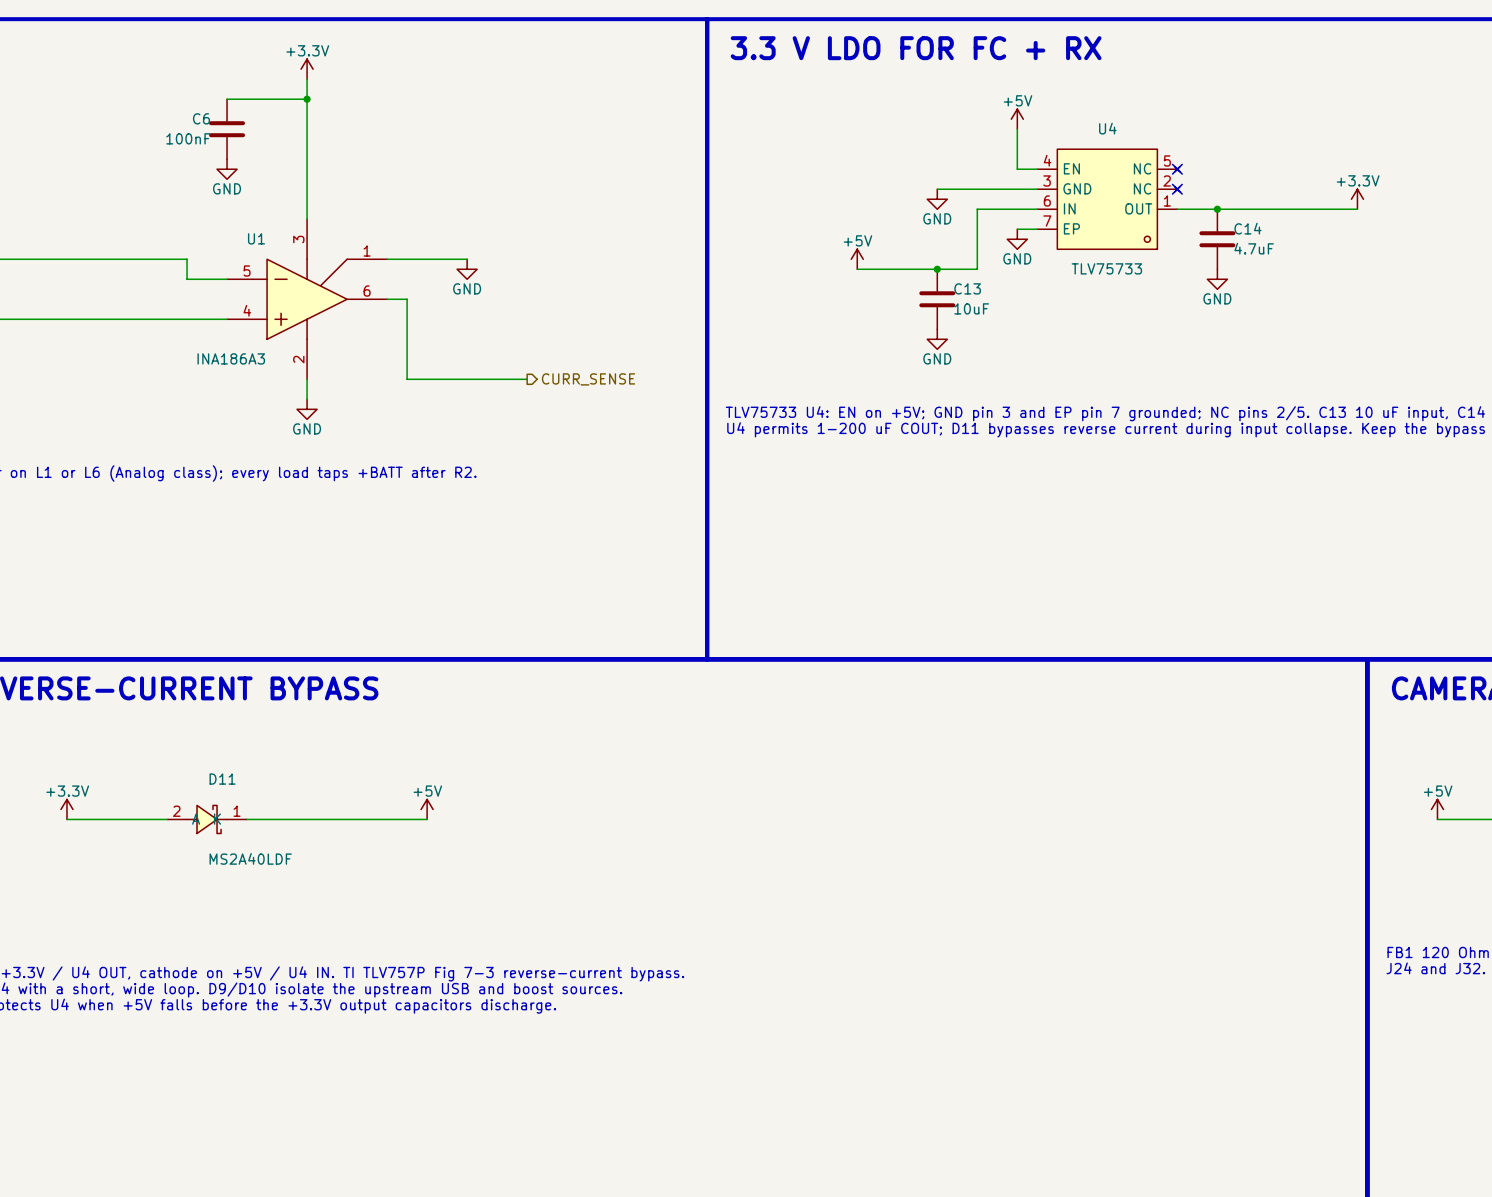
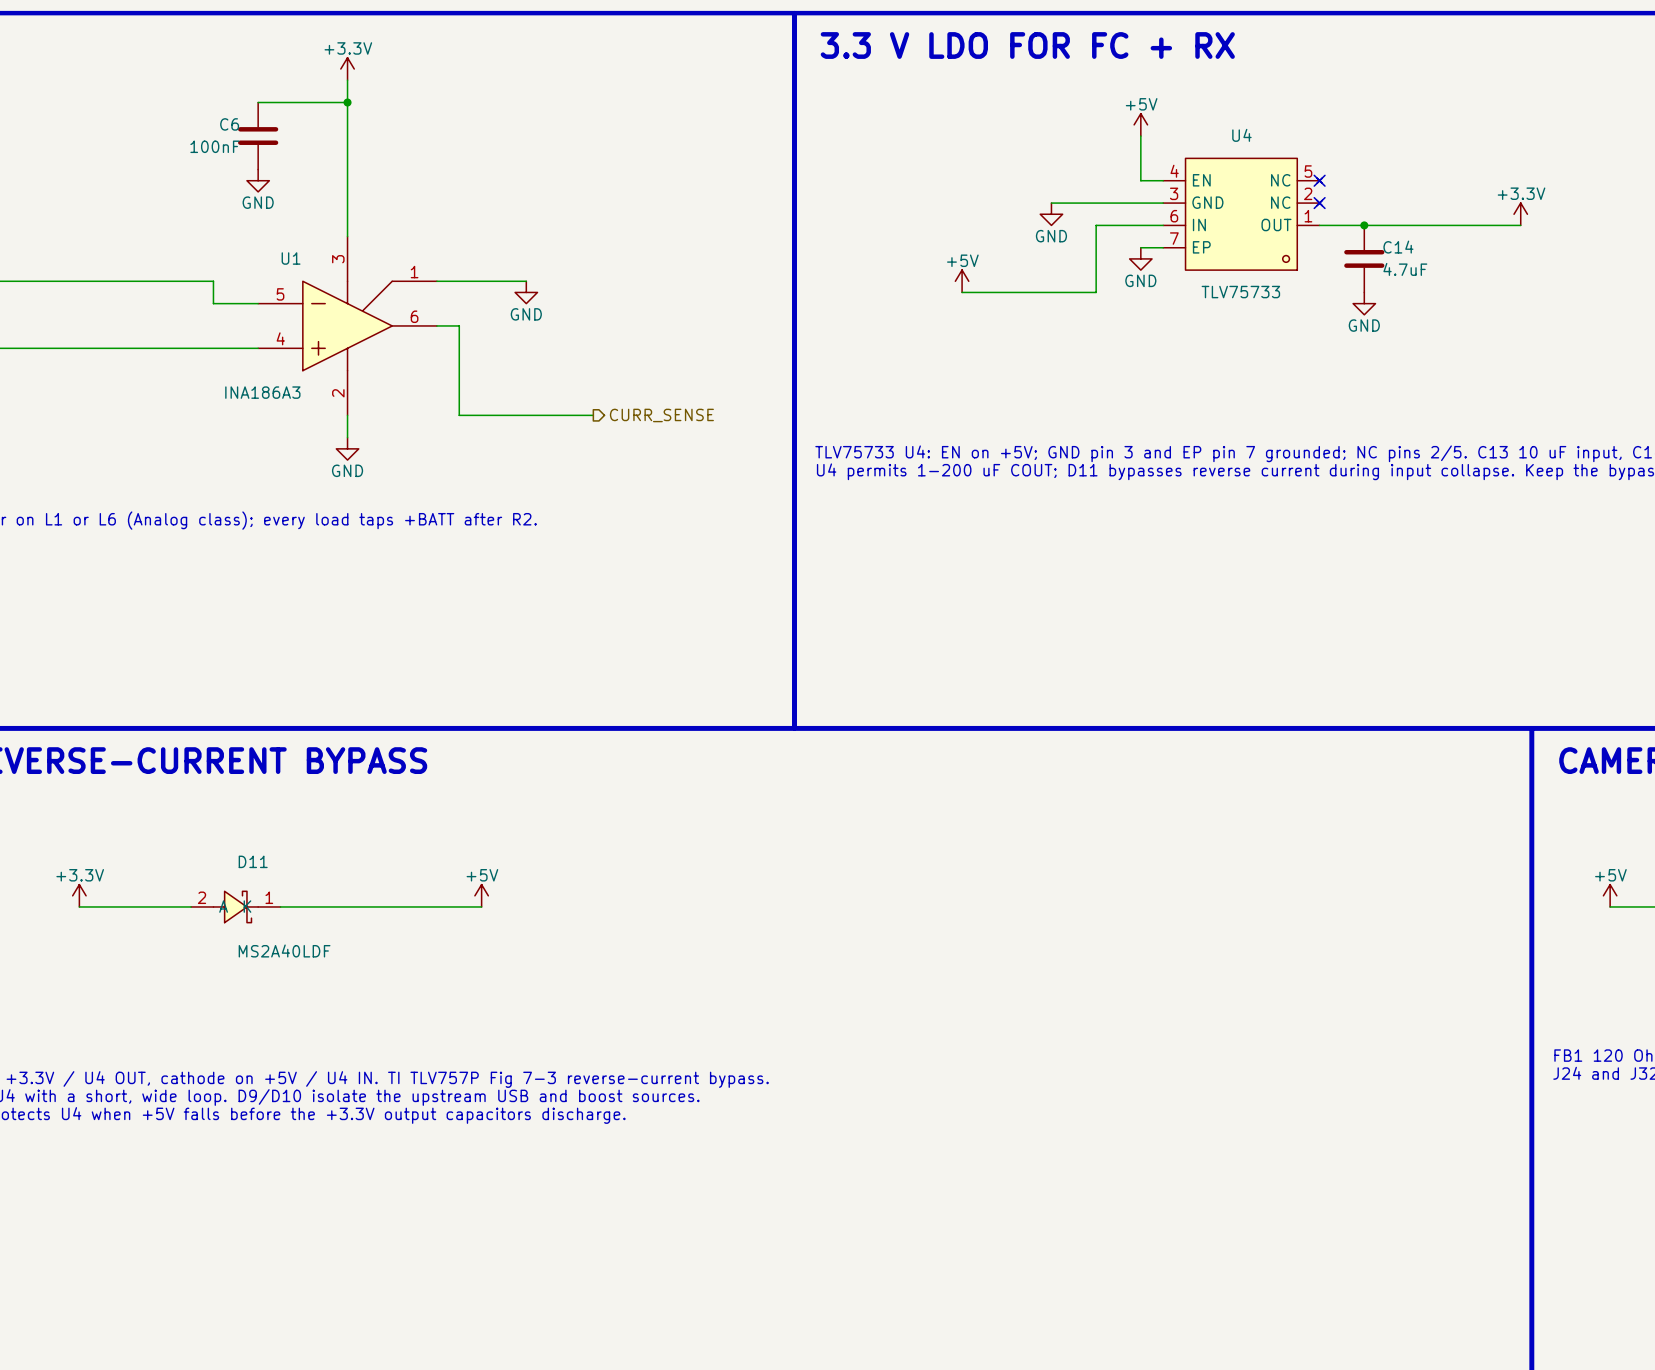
junction: (937, 269) -> none
C13: 10uF (937, 299) -> none
power symbol: GND (937, 339) -> none

